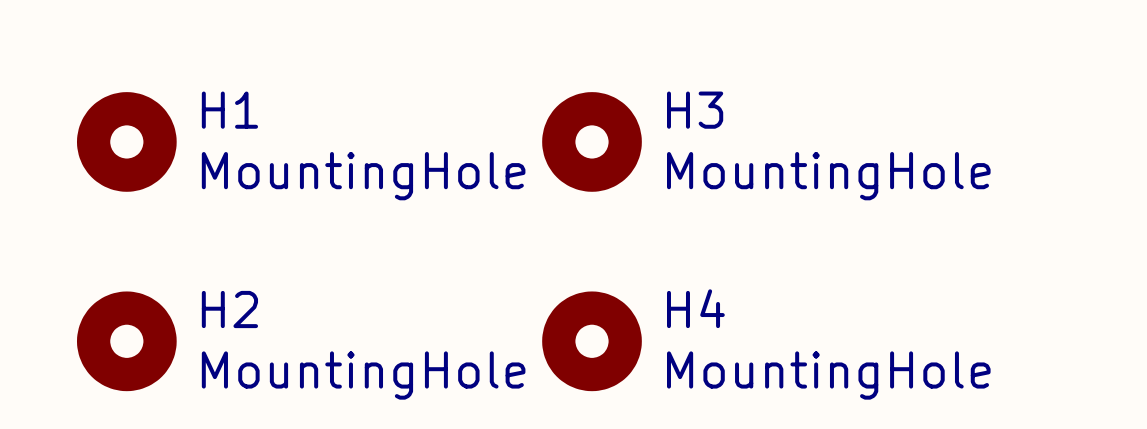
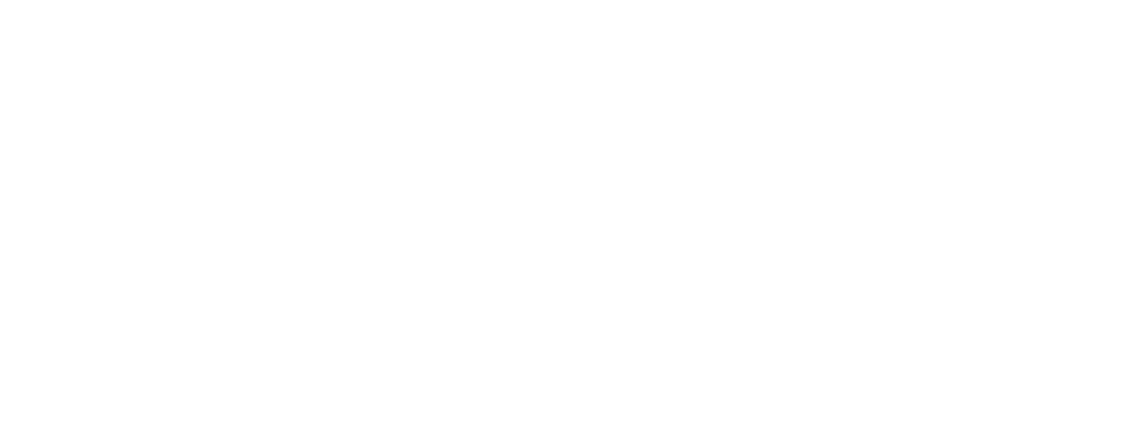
H1: MountingHole (126, 141) -> none
H3: MountingHole (592, 141) -> none
H2: MountingHole (126, 341) -> none
H4: MountingHole (592, 341) -> none

